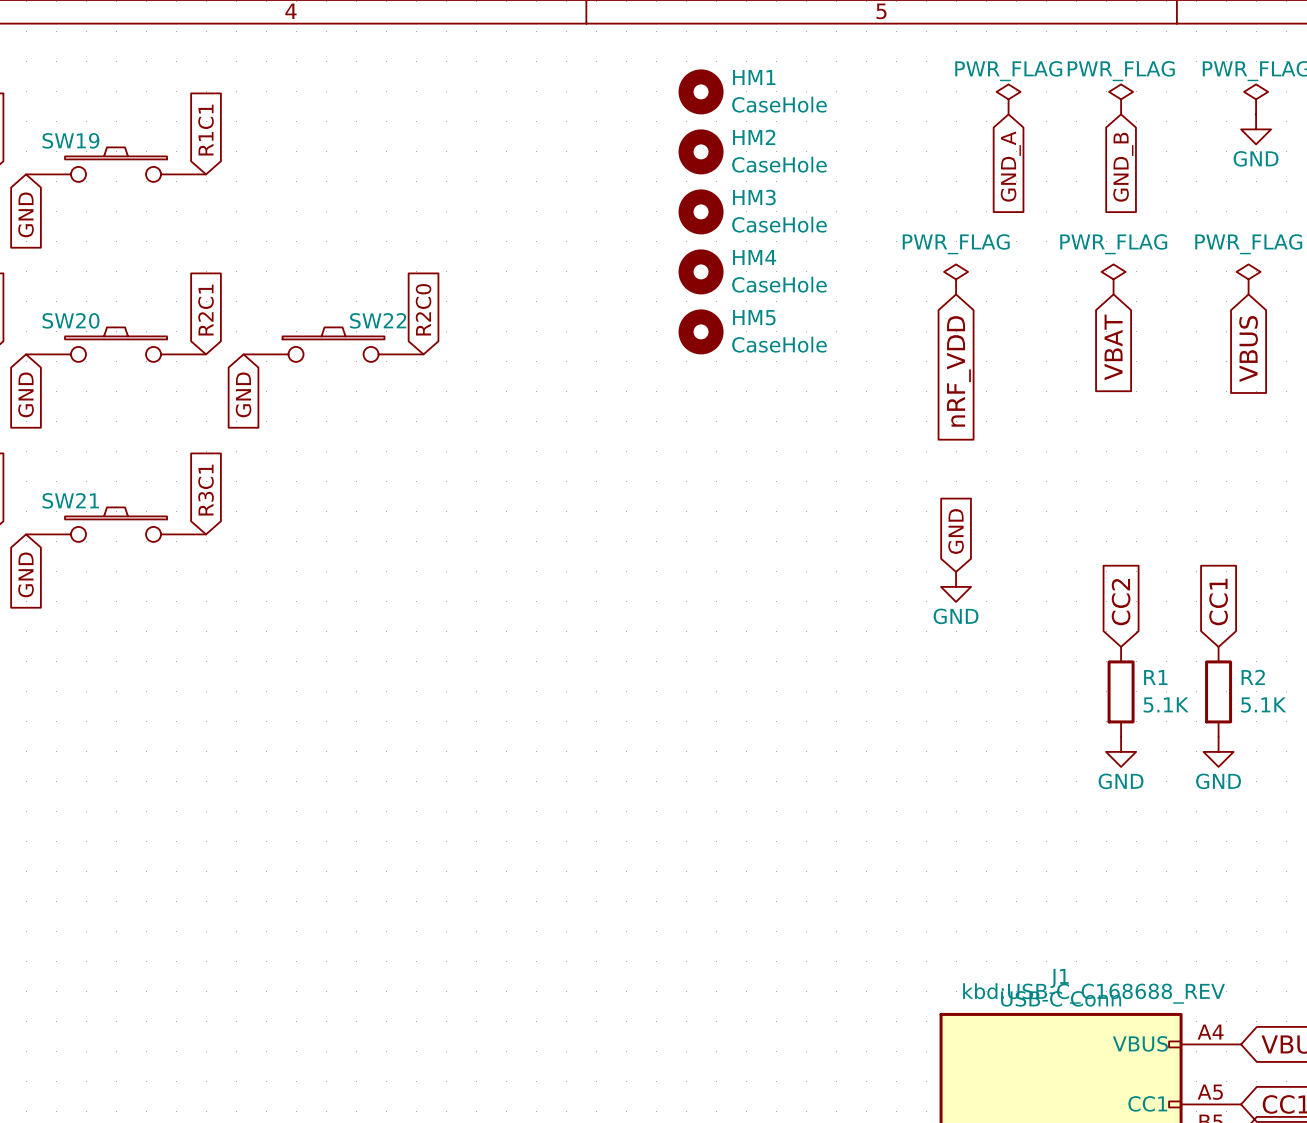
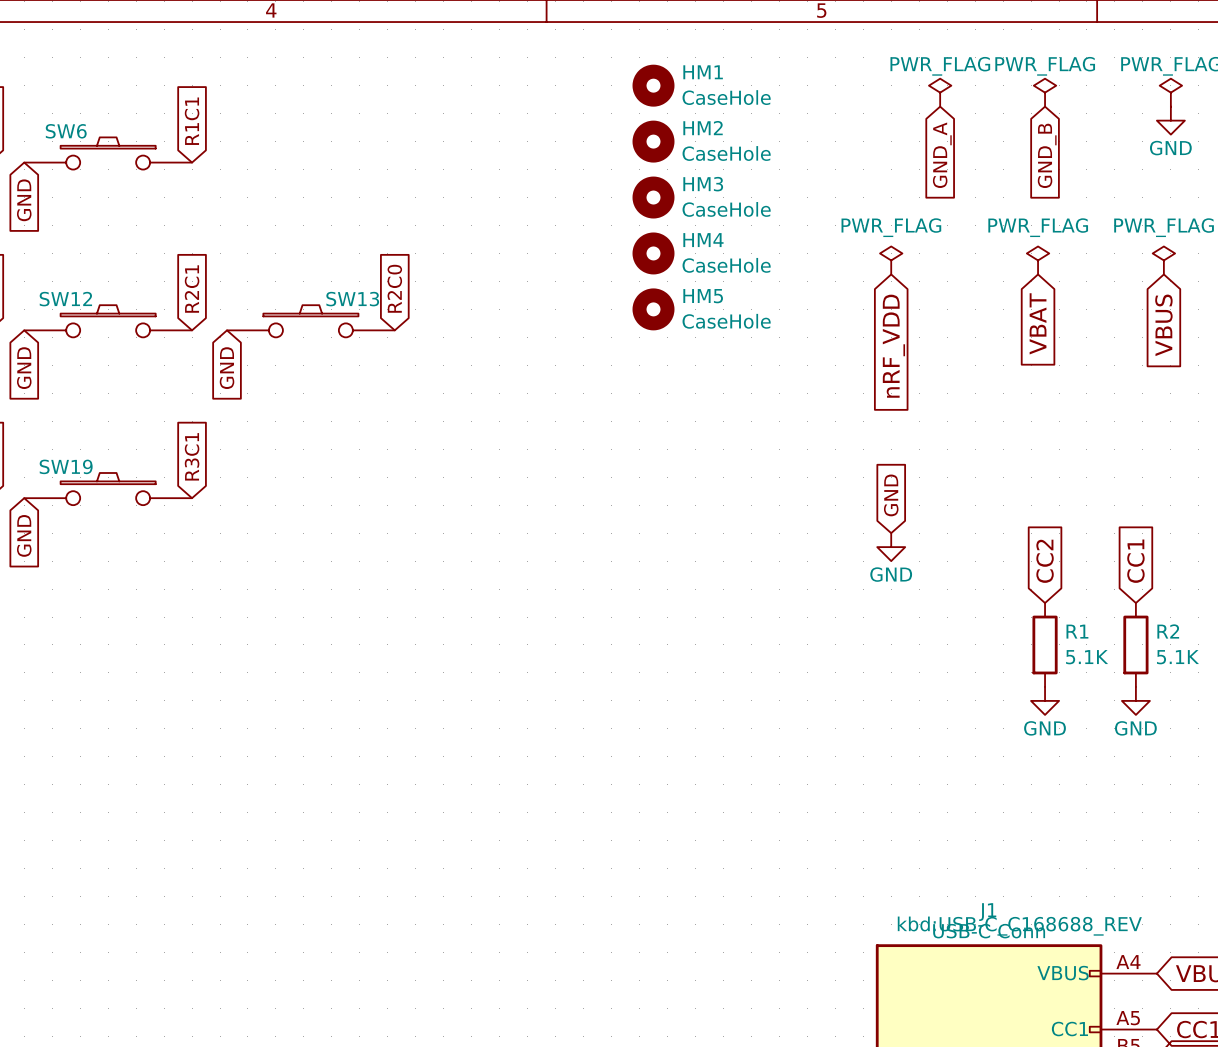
SW19 name: SW19 (70, 140) -> SW6 (66, 131)
SW20 name: SW20 (71, 320) -> SW12 (65, 299)
SW22 name: SW22 (378, 320) -> SW13 (352, 299)
SW21 name: SW21 (70, 500) -> SW19 (66, 466)

